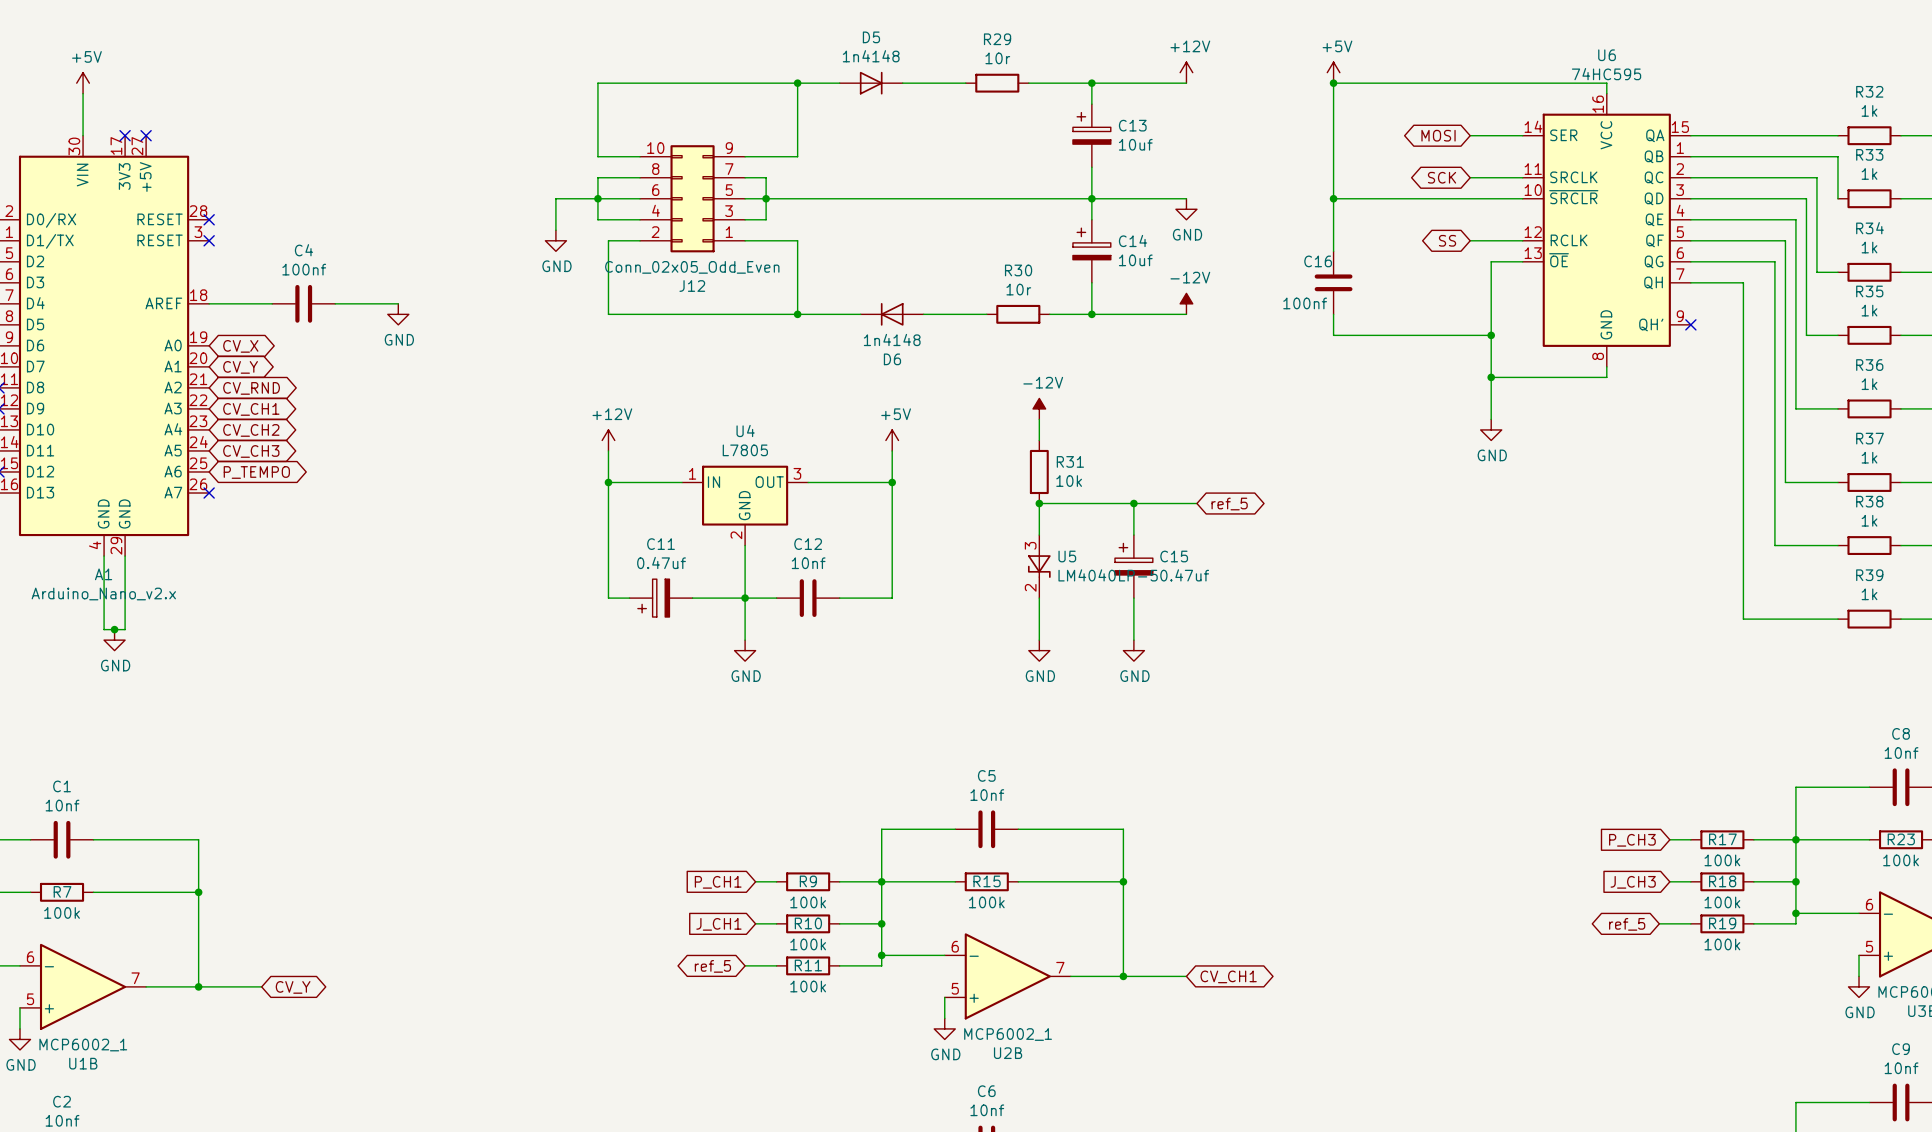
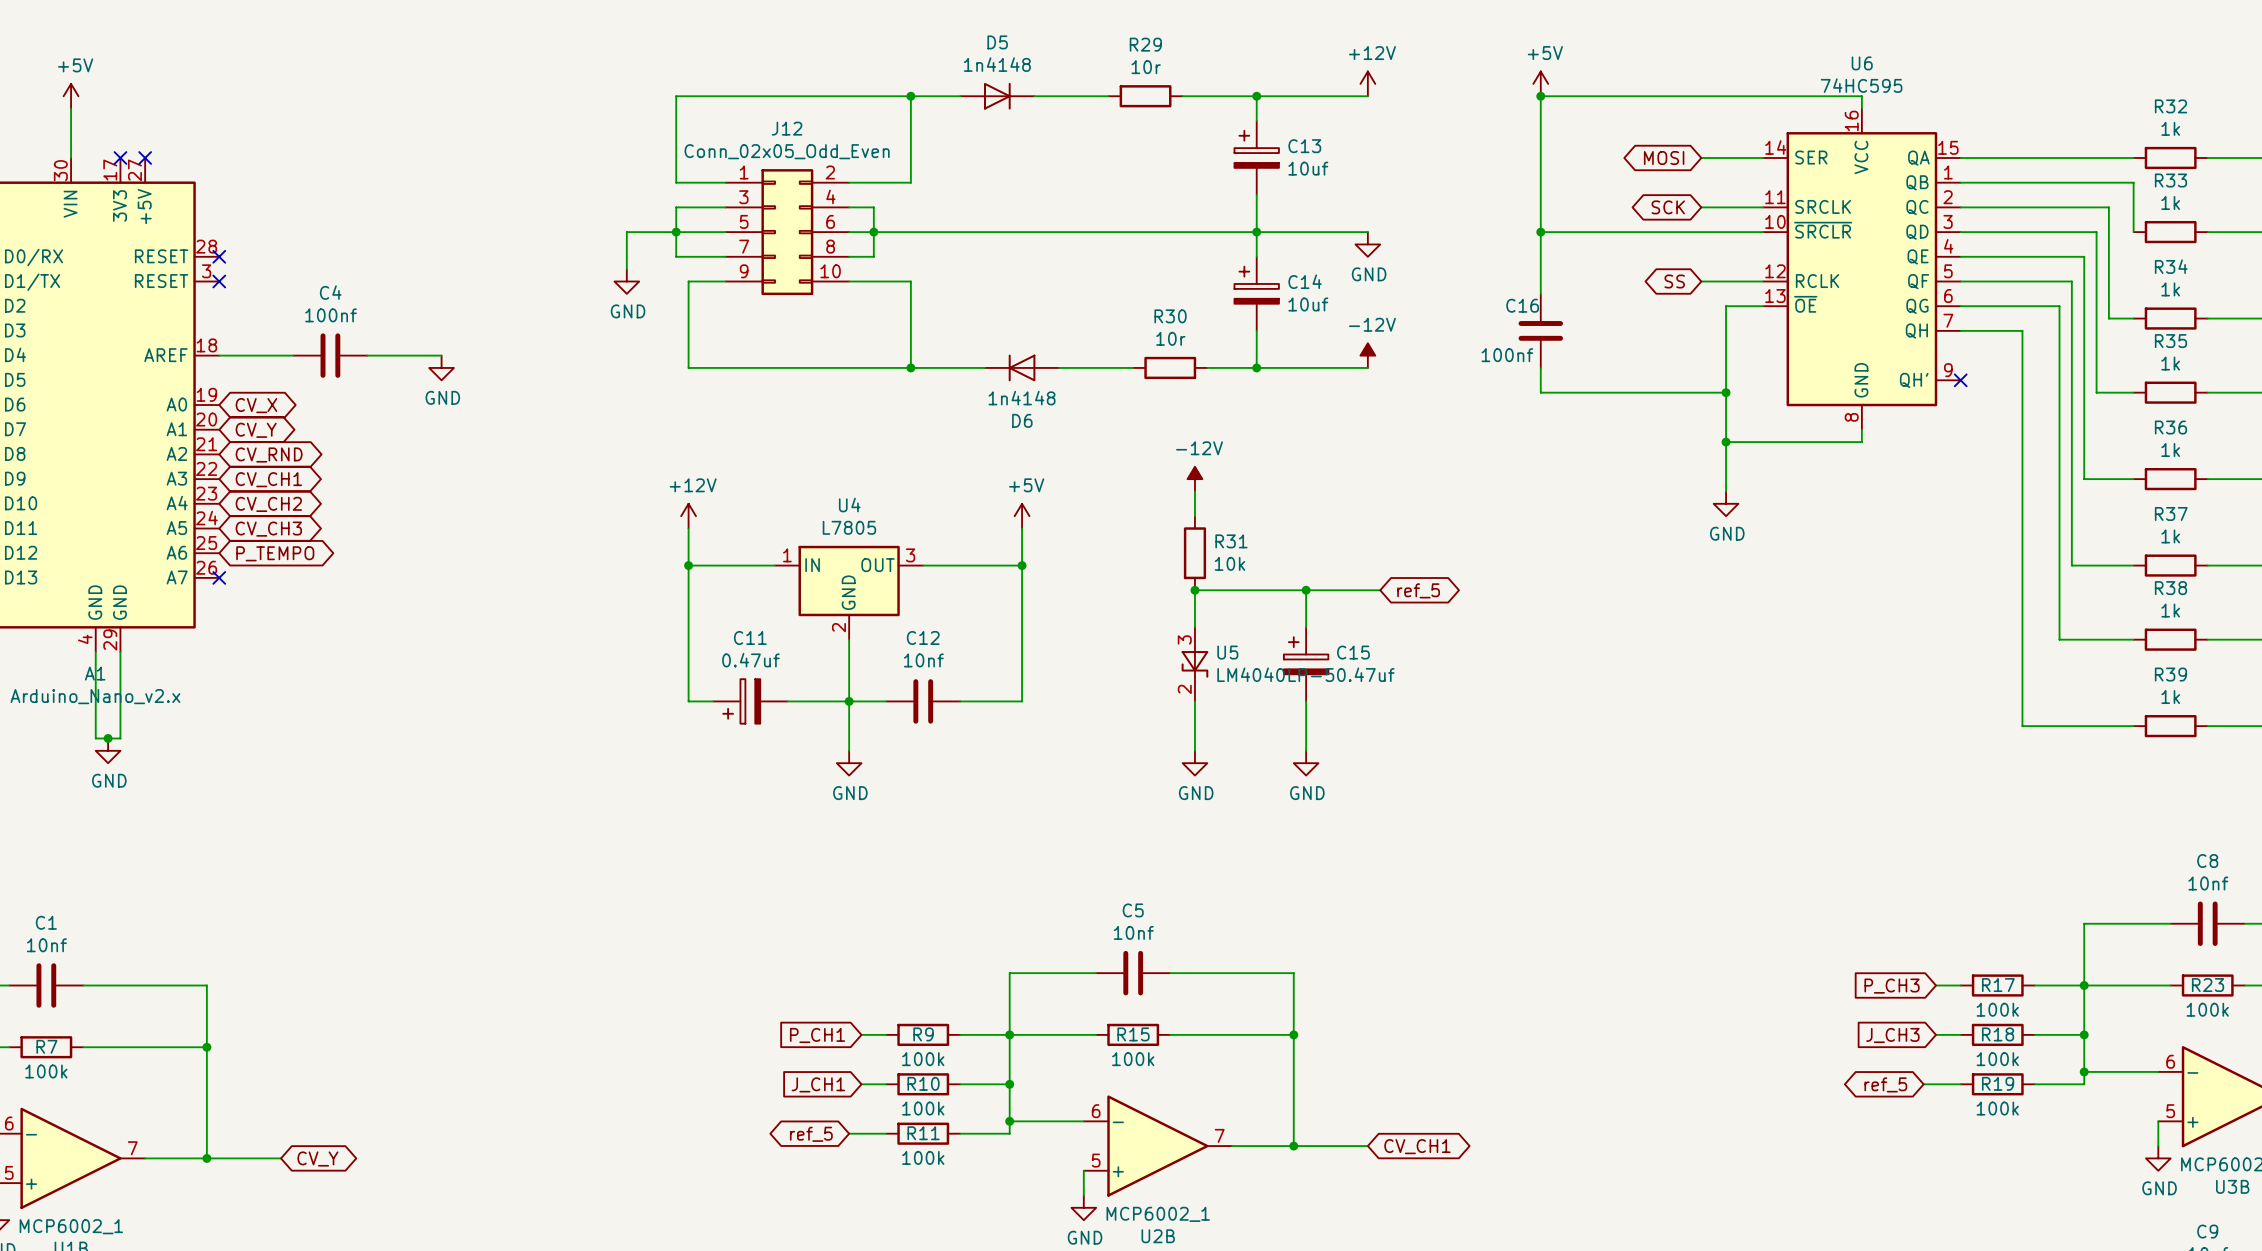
J12 rotation: 0° (692, 198) -> 180° (787, 232)

